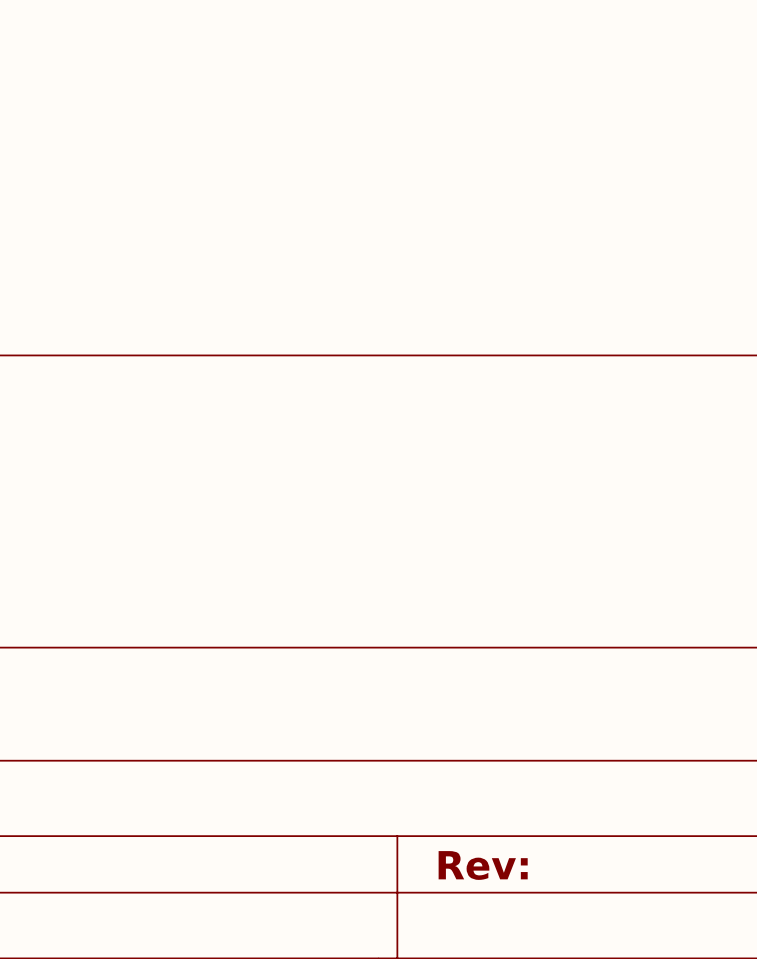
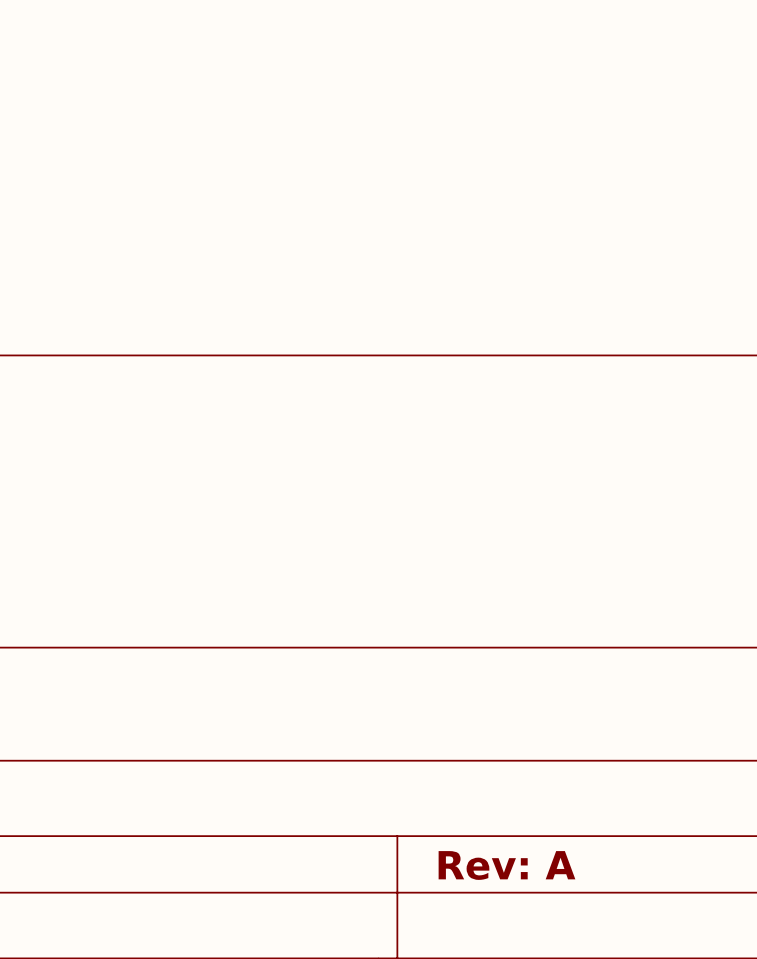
title block: Rev: (483, 865) -> Rev: A (506, 865)

